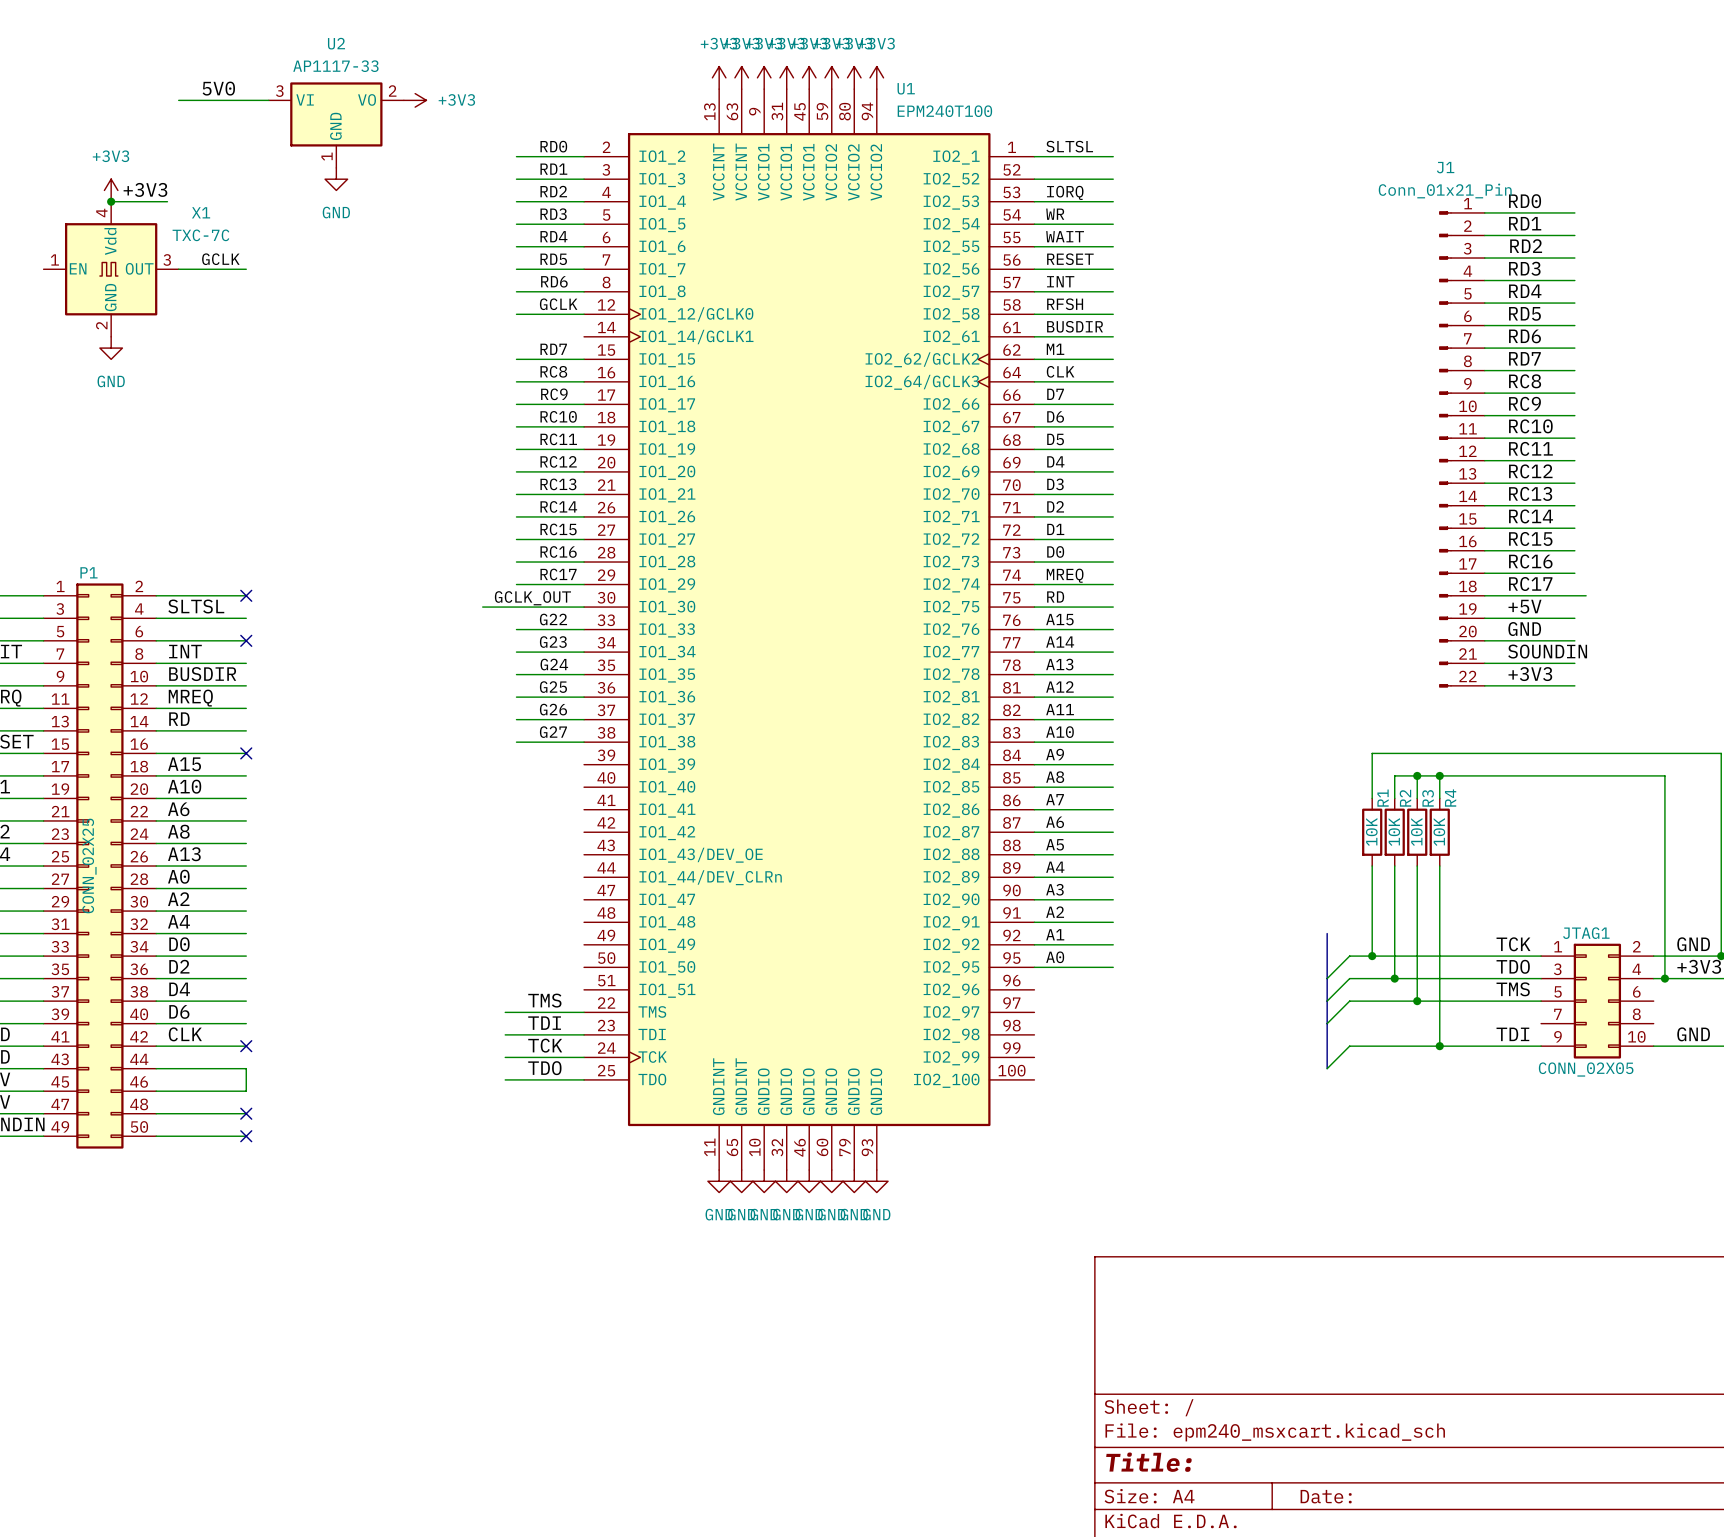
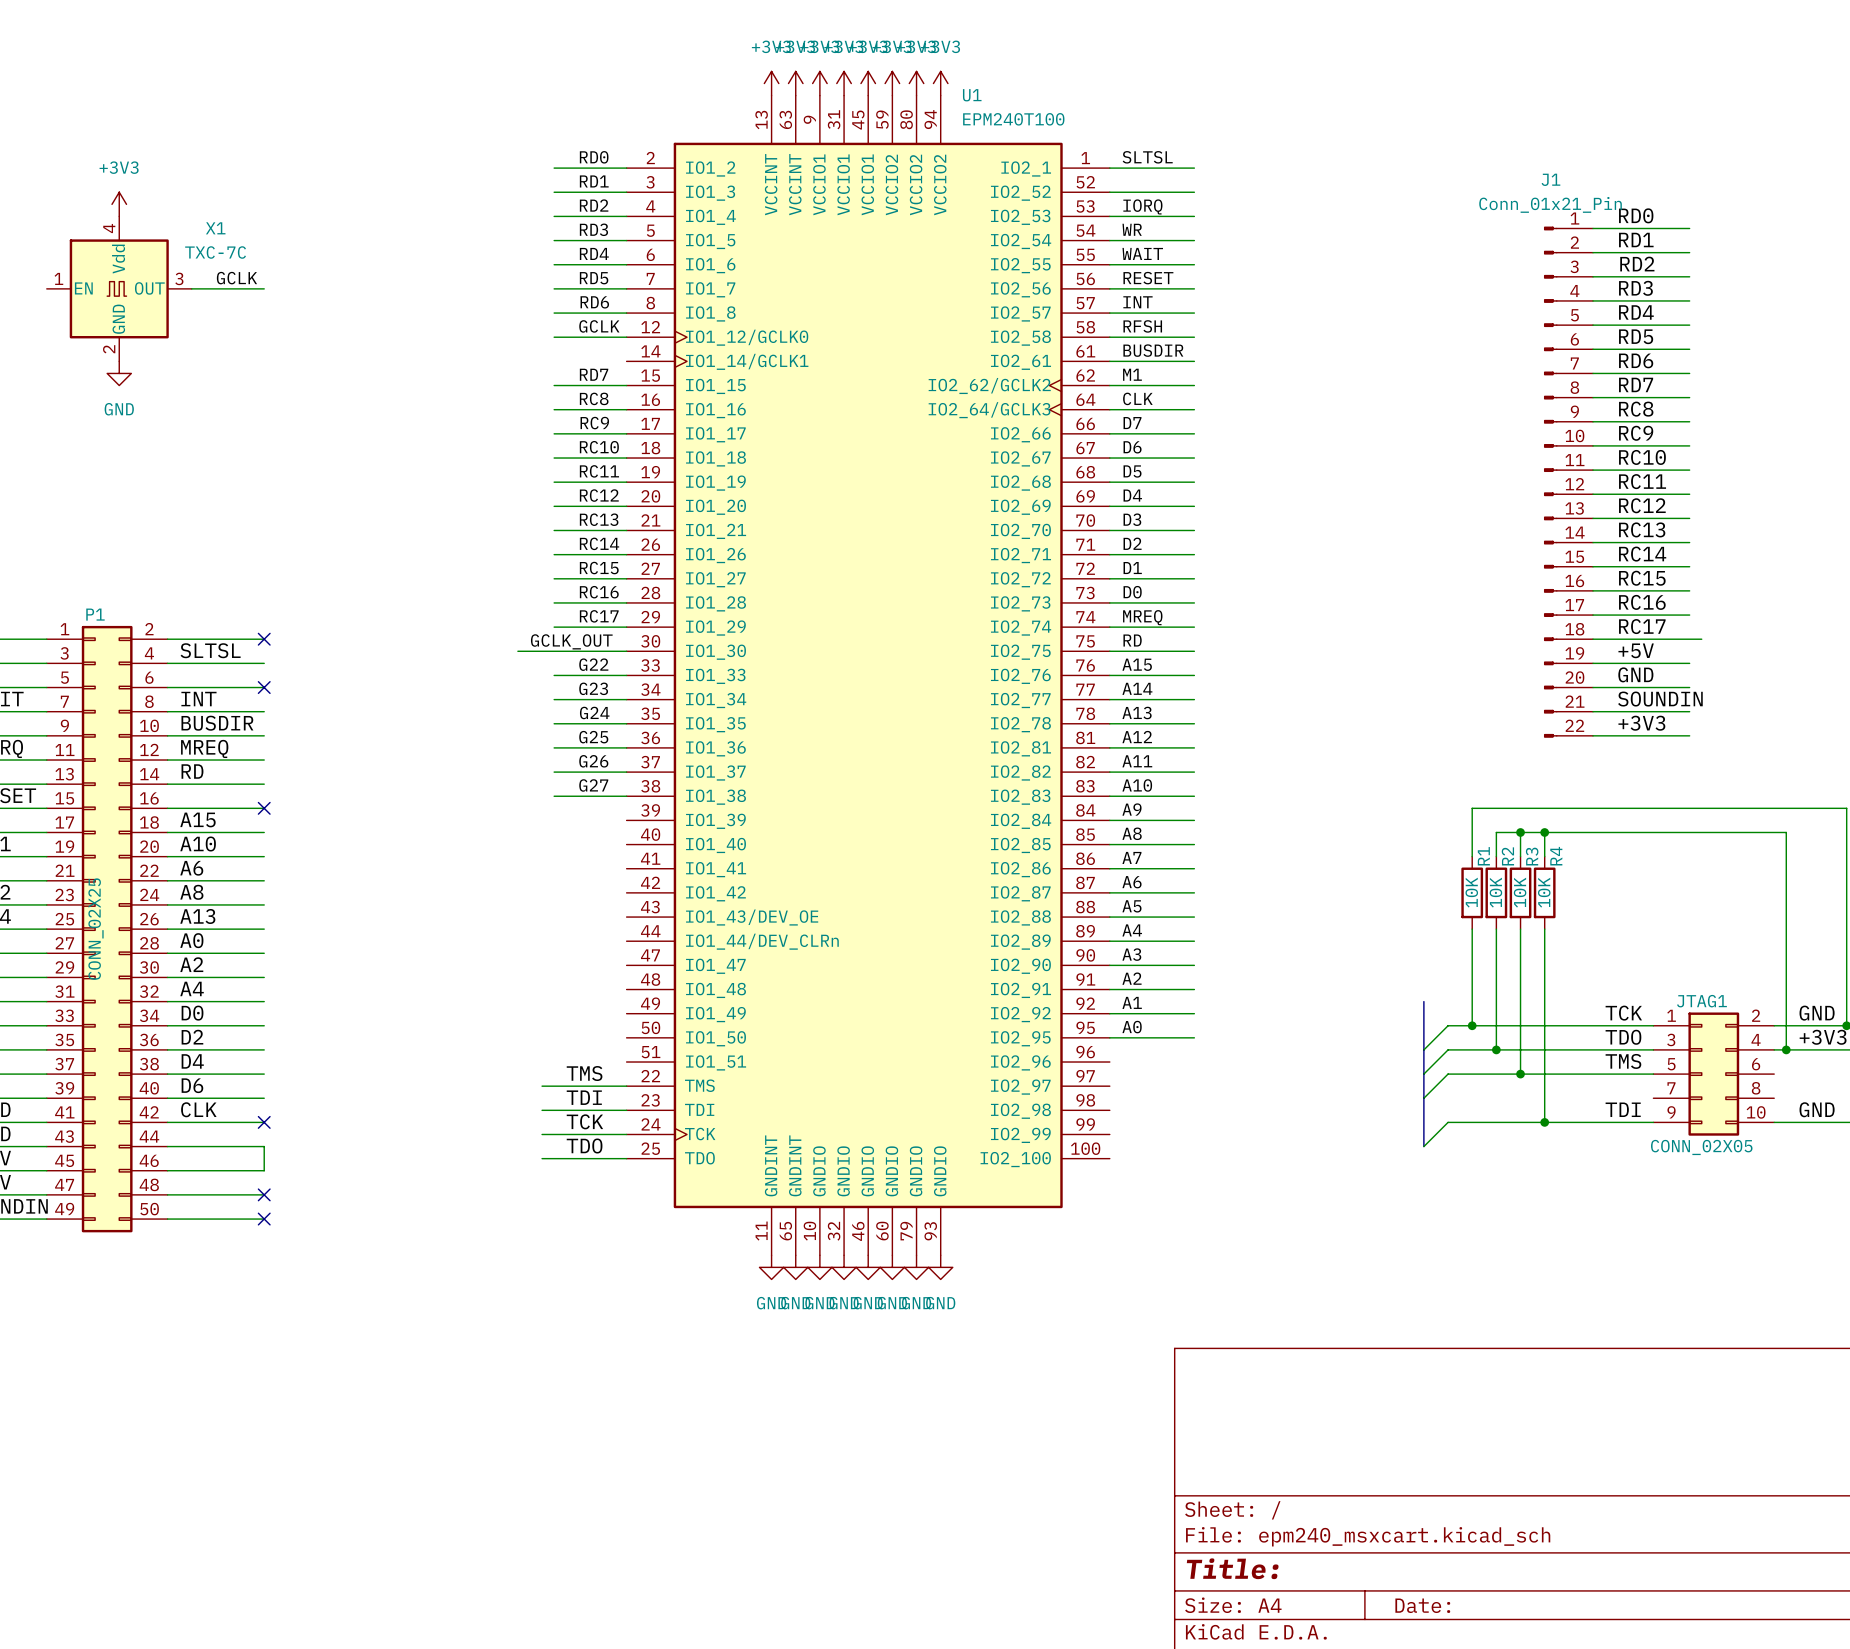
label: 5V0 (218, 88) -> none
wire: (178, 100) (268, 100) -> none
power symbol: +3V3 (415, 100) -> none
U2: AP1117-33 (336, 125) -> none
power symbol: GND (336, 179) -> none
label: +3V3 (145, 189) -> none
wire: (111, 201) (167, 201) -> none
junction: (111, 201) -> none

